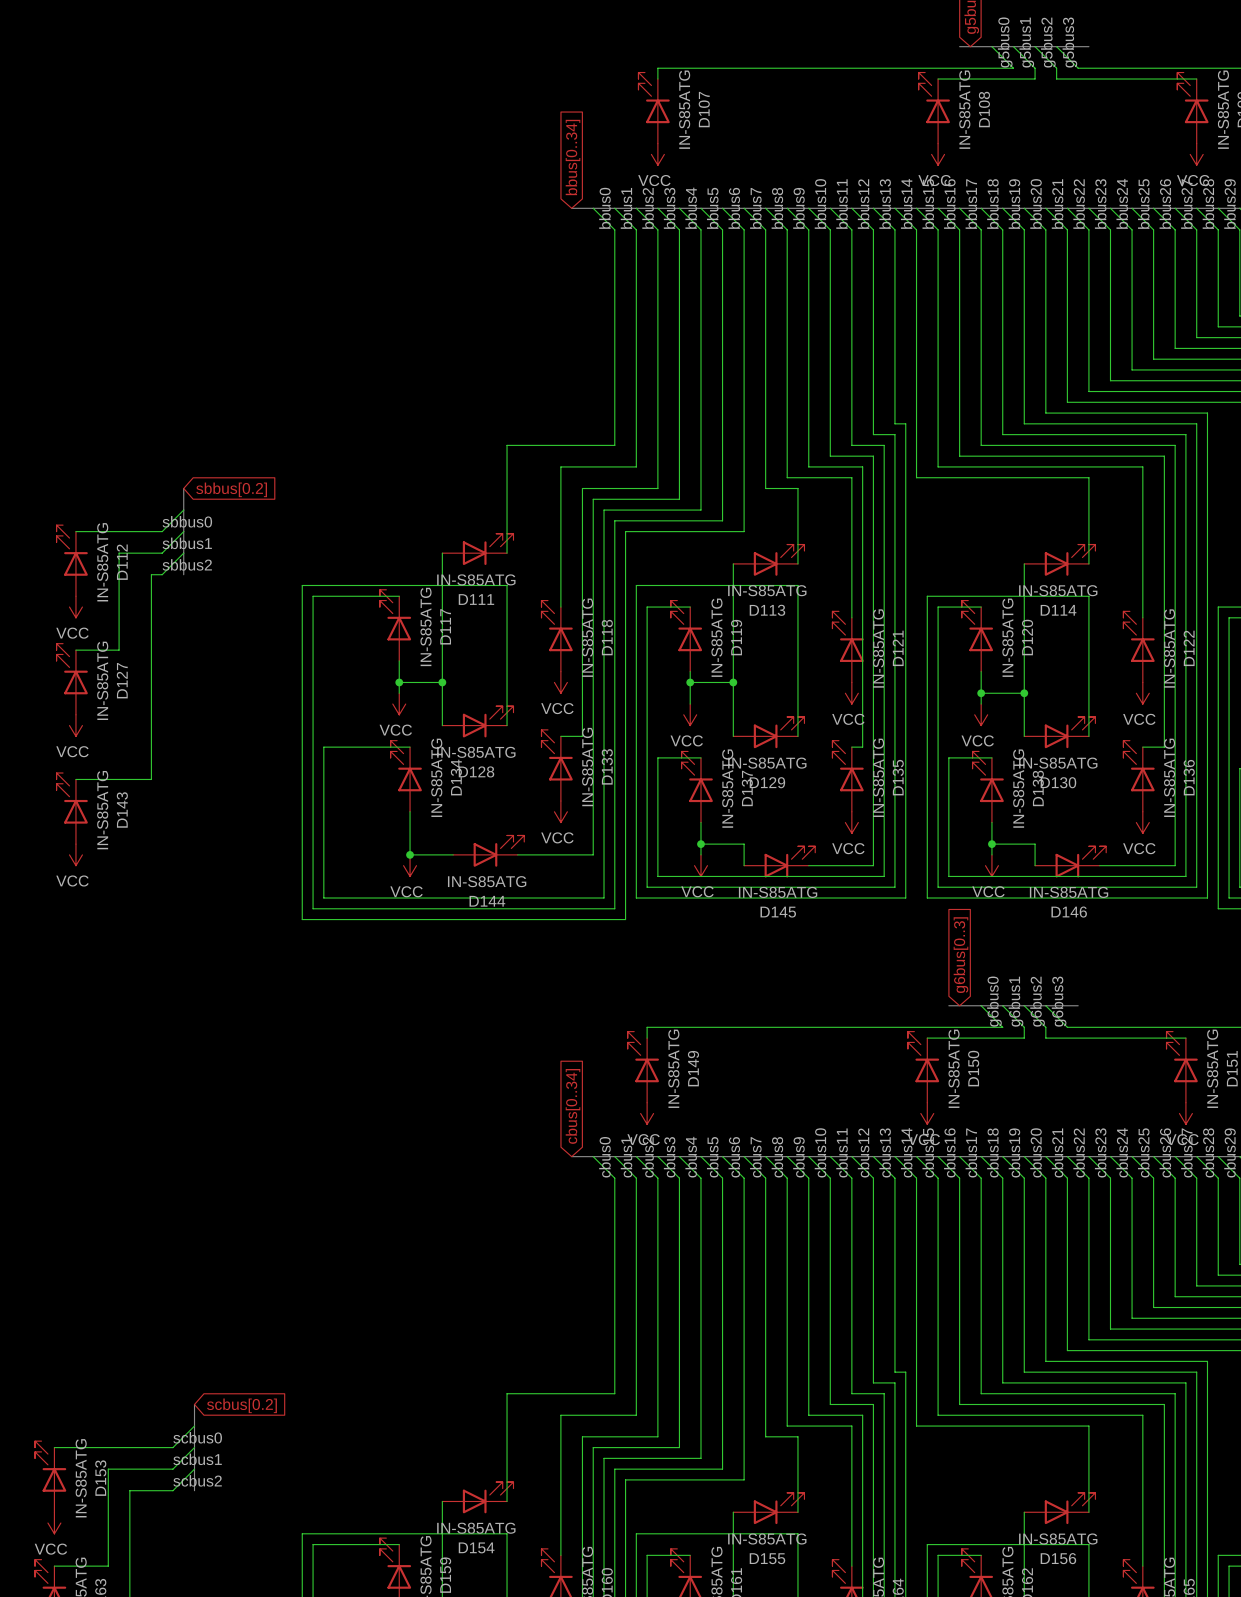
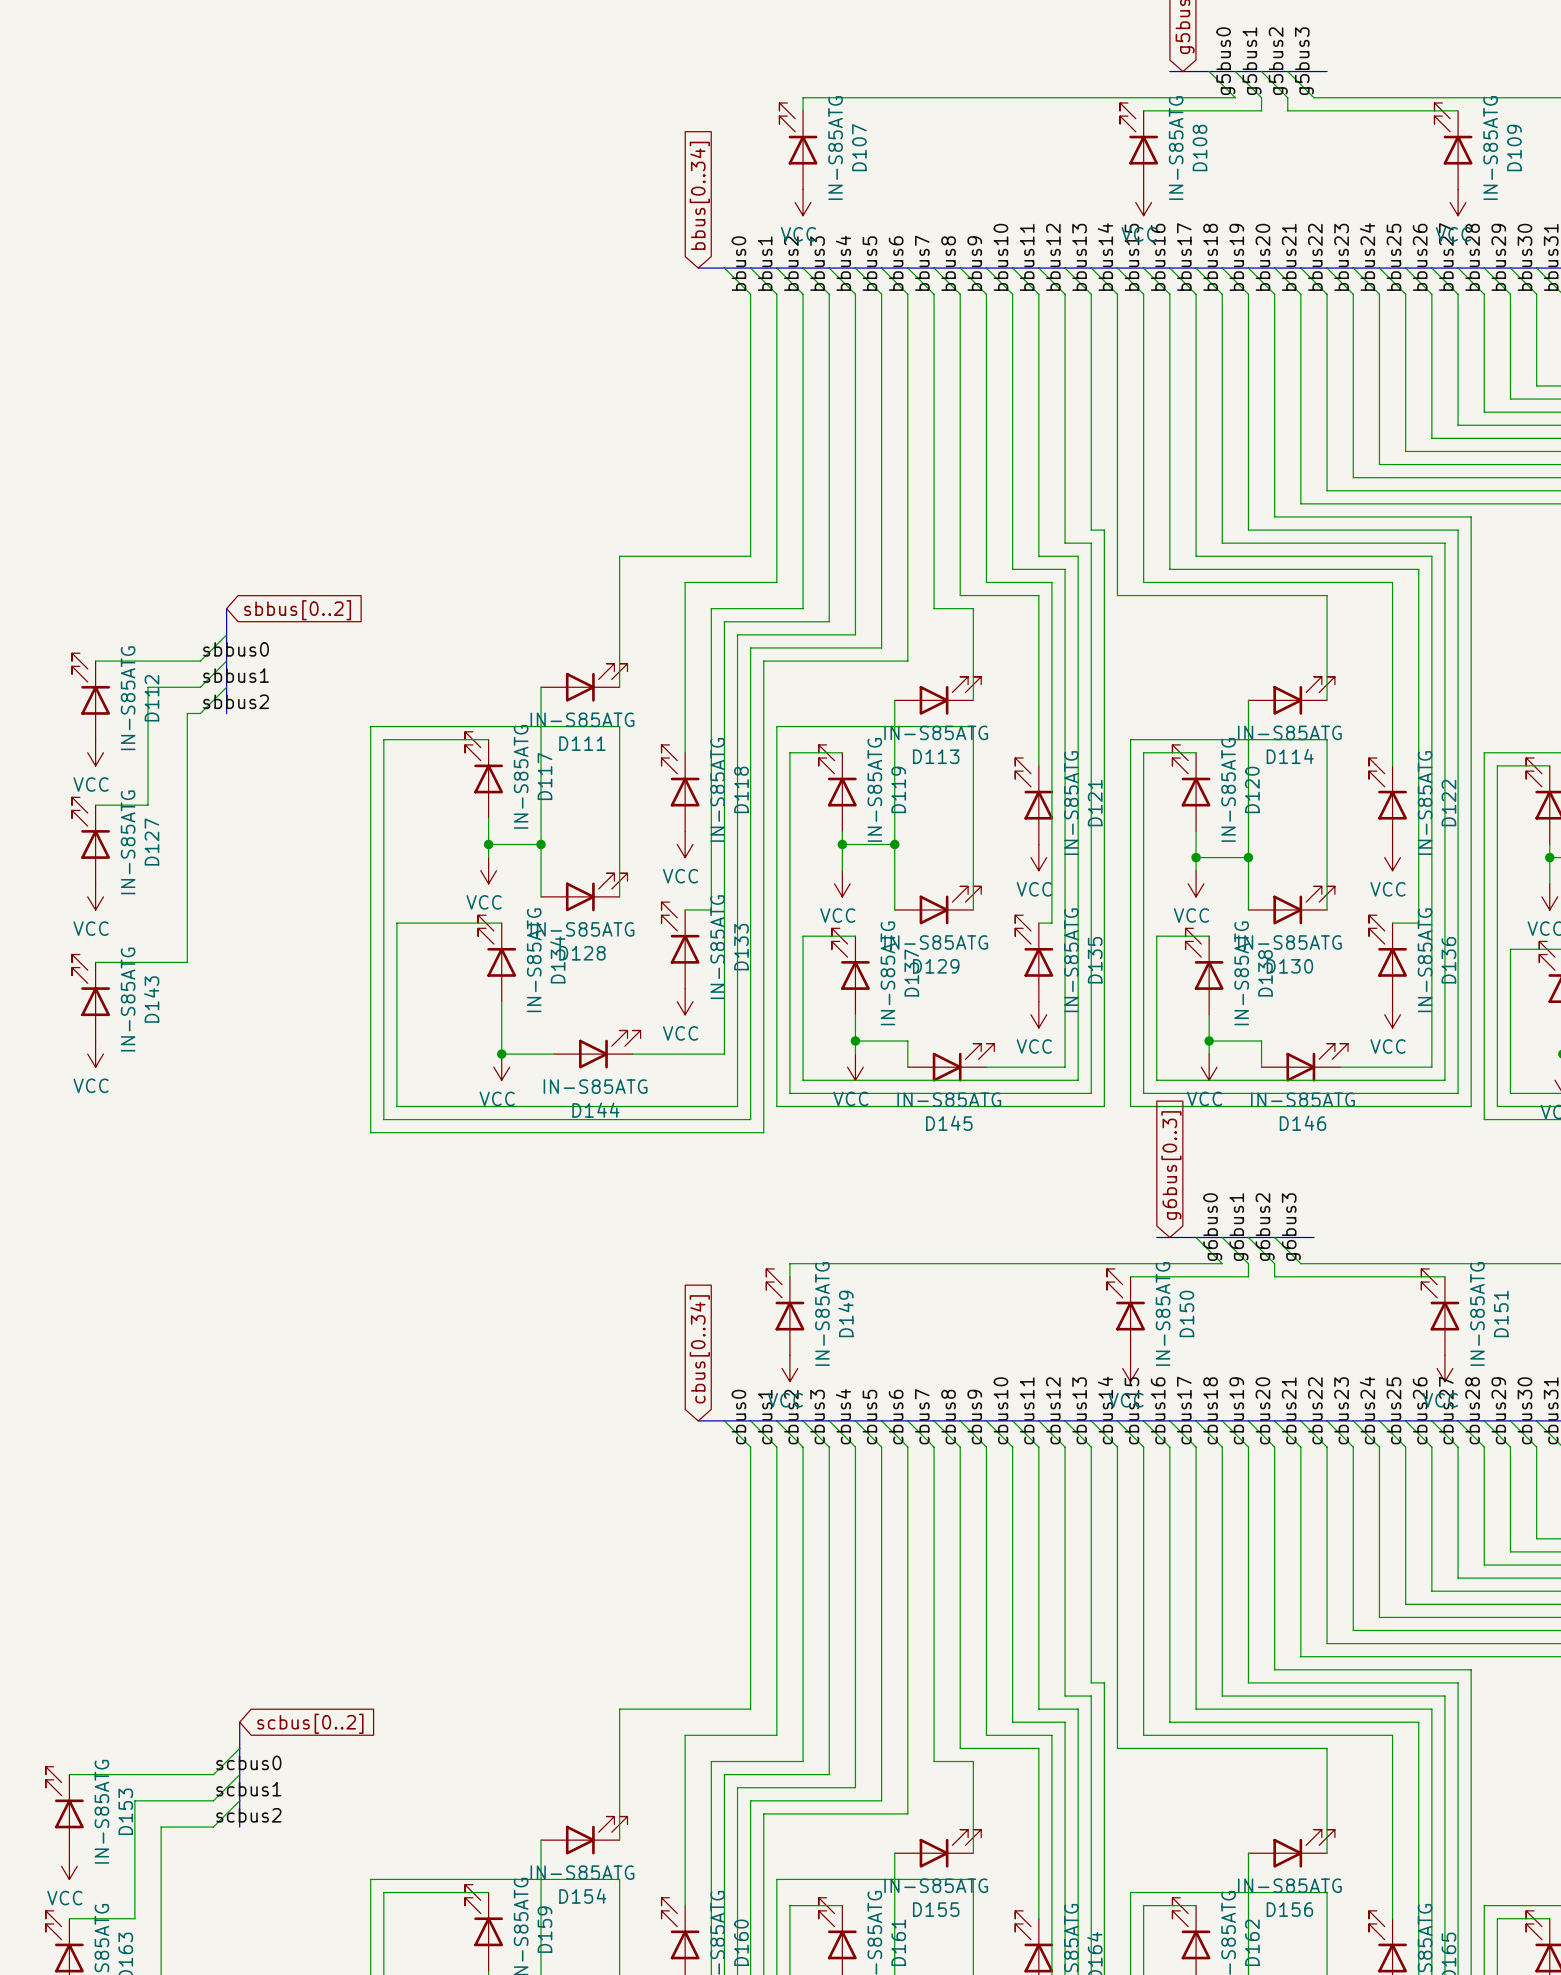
global label: sbbus[0.2] (231, 489) -> sbbus[0..2] (297, 610)
global label: scbus[0.2] (241, 1405) -> scbus[0..2] (310, 1723)

